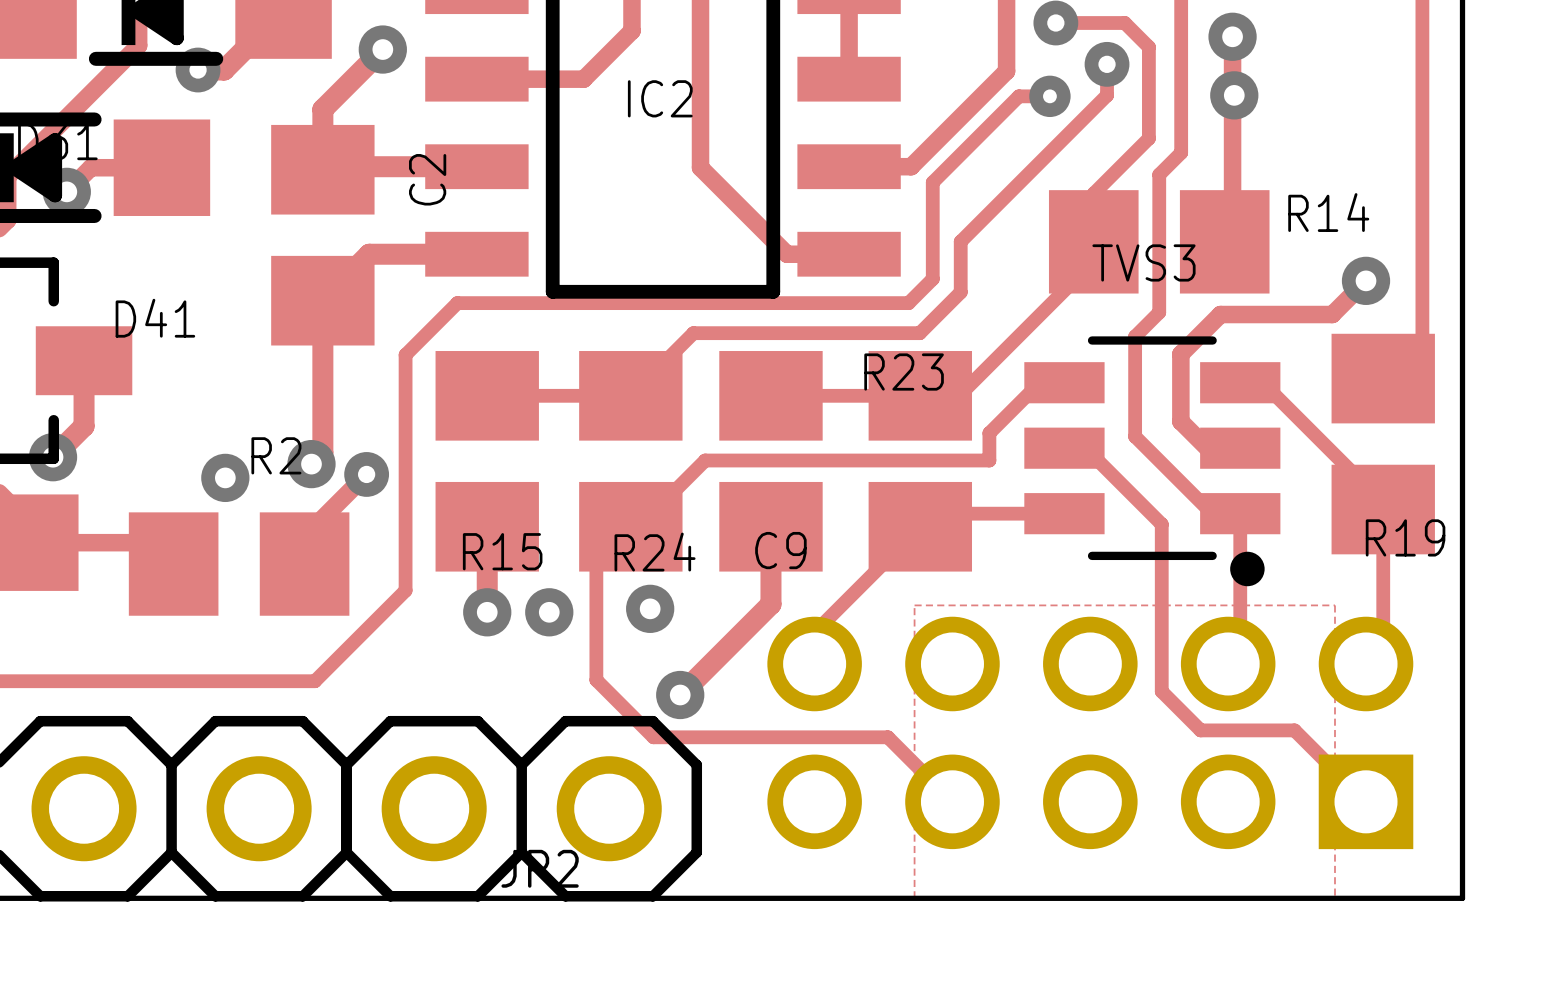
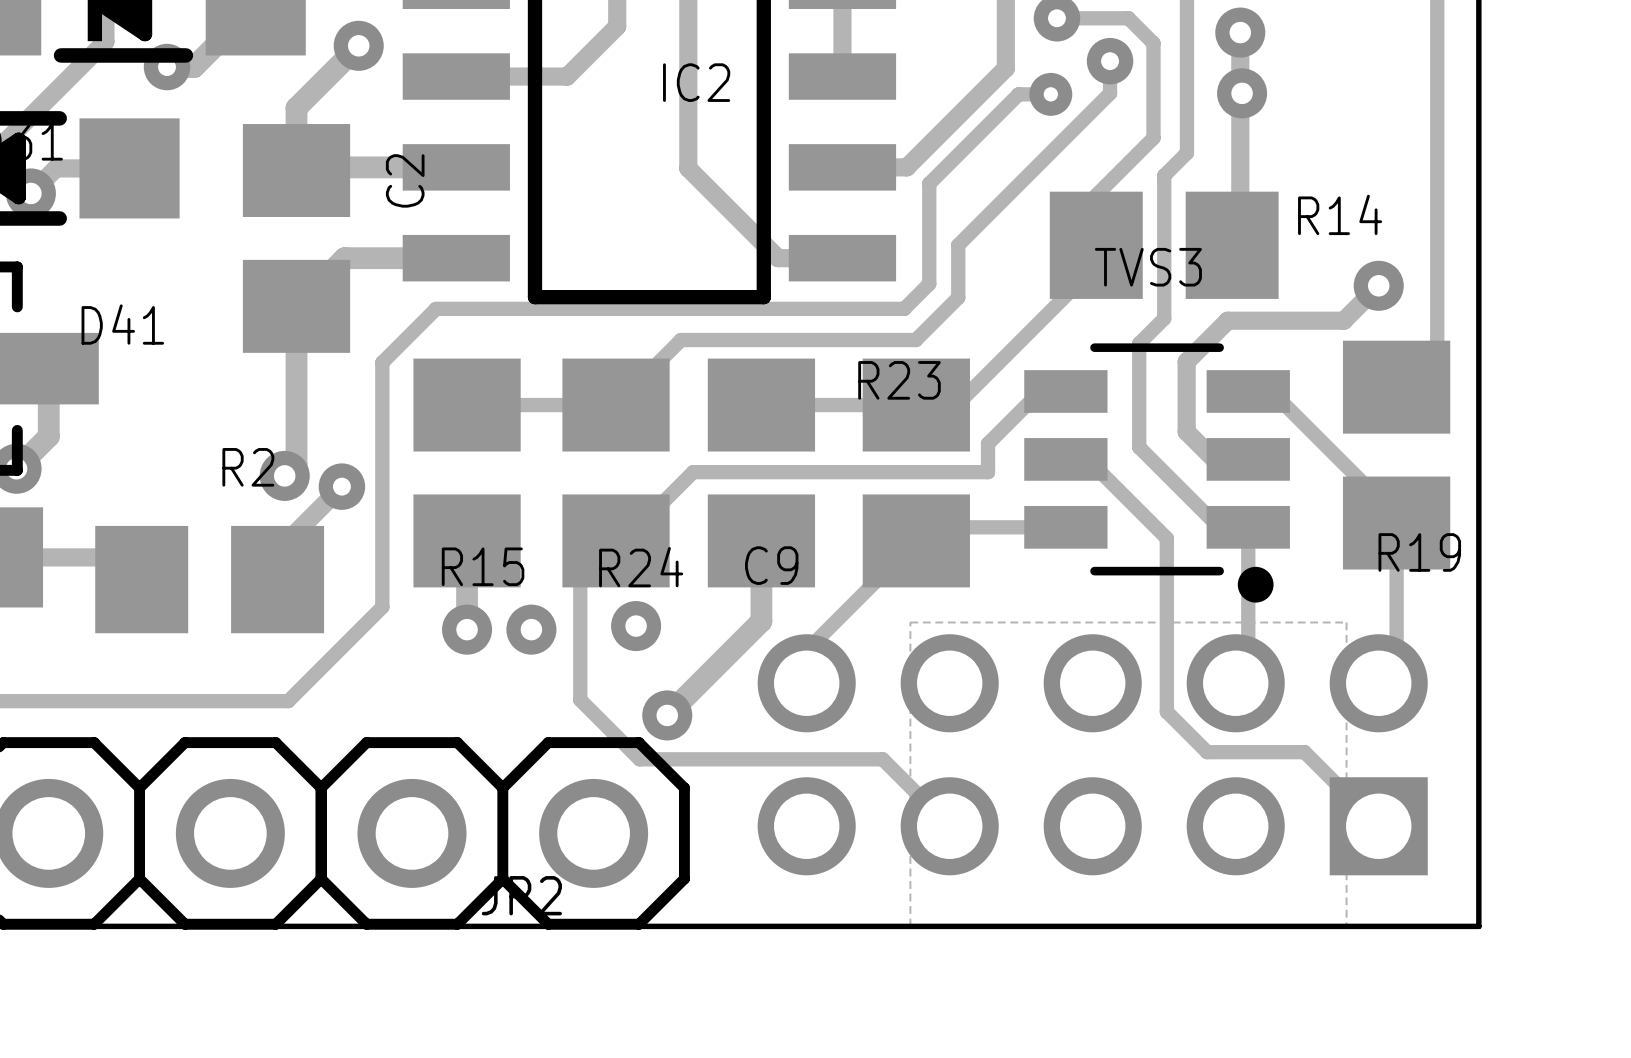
IC2 name position: IC2 (660, 98) -> IC2 (696, 82)
via: (225, 477) -> none

